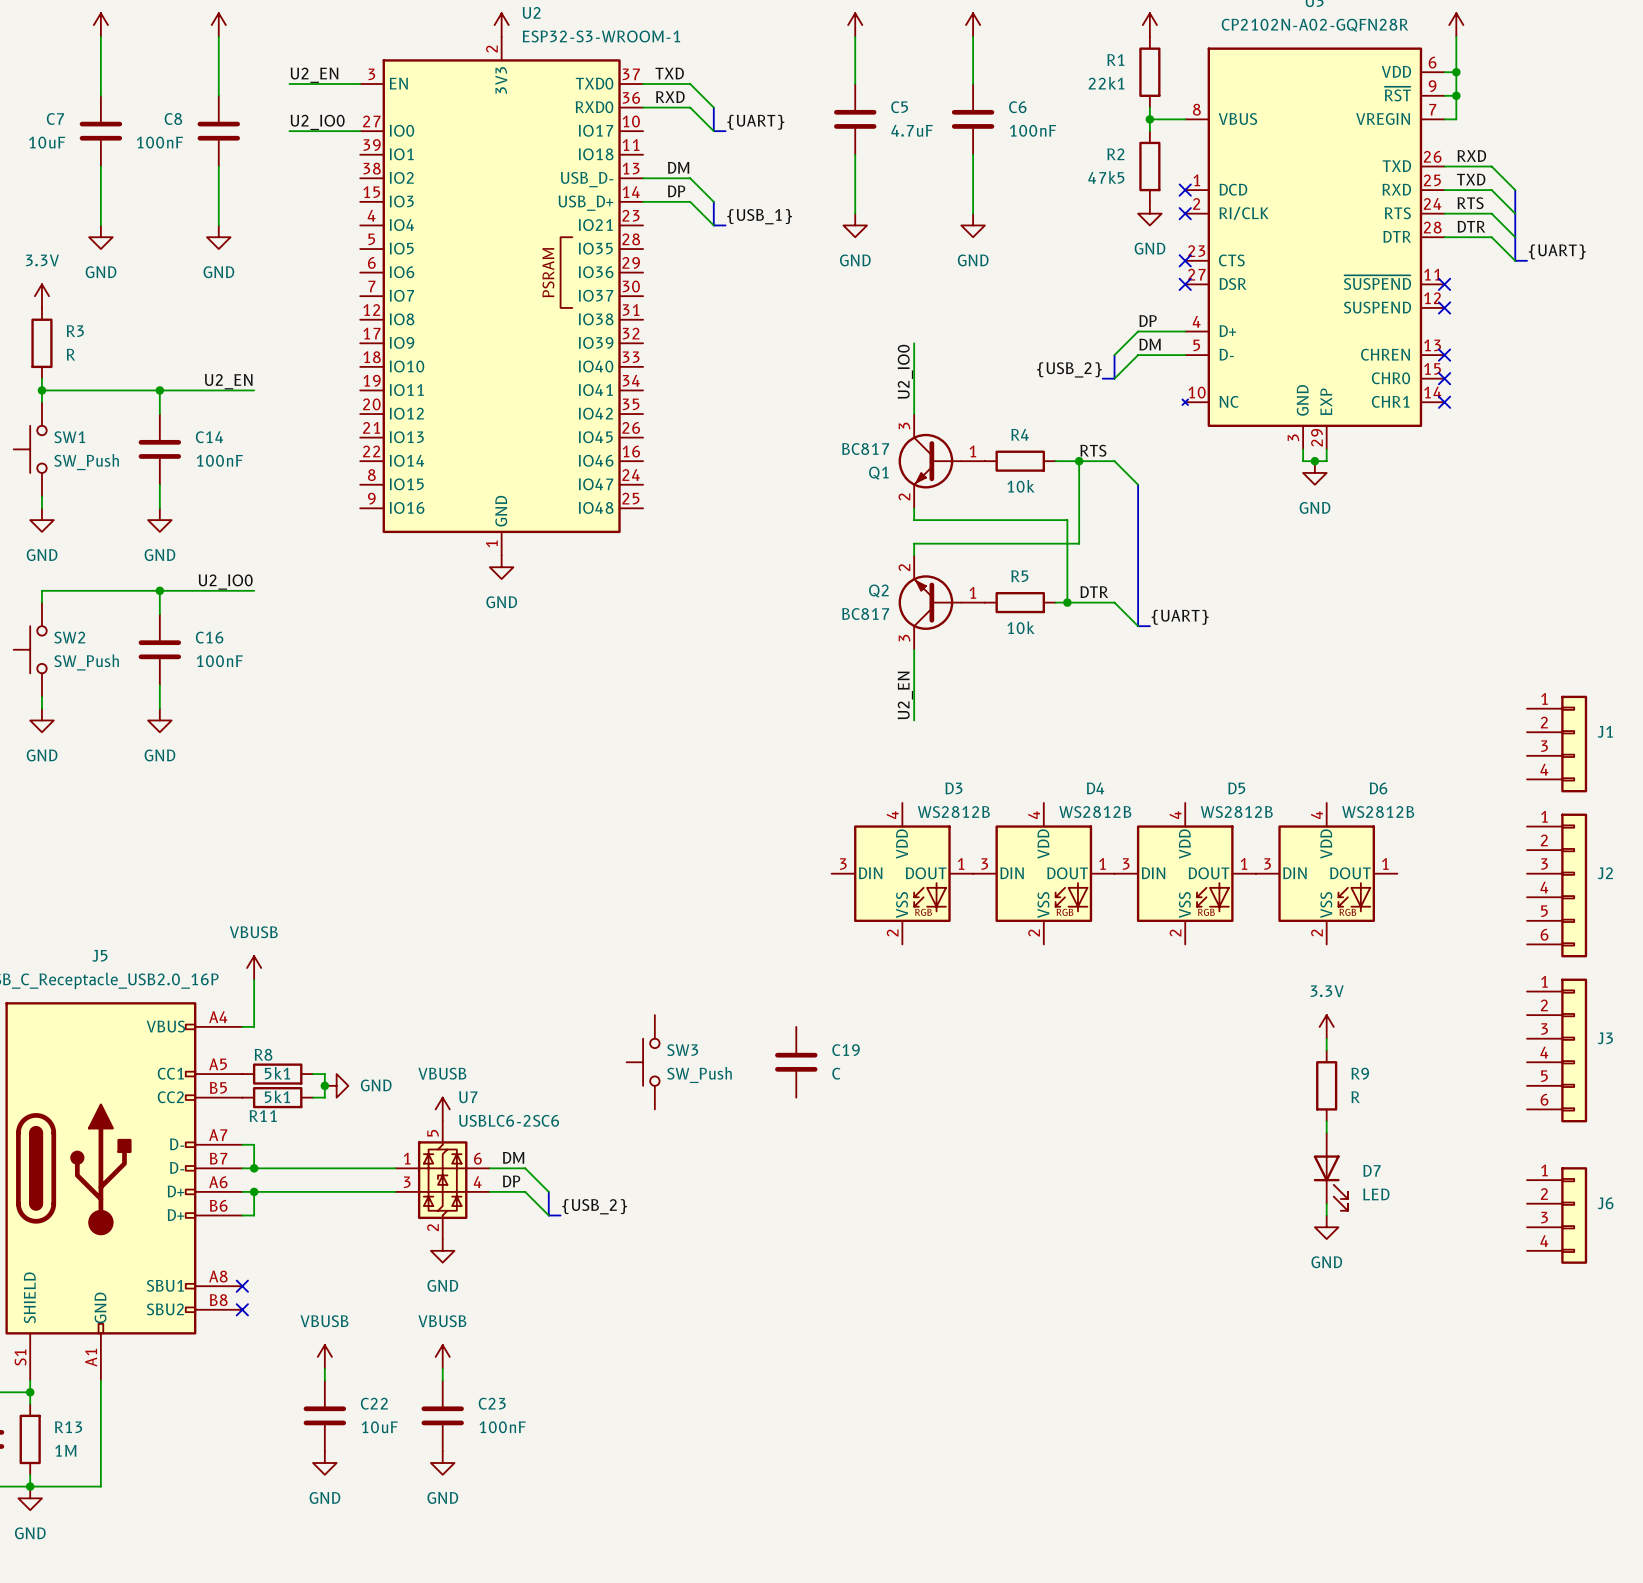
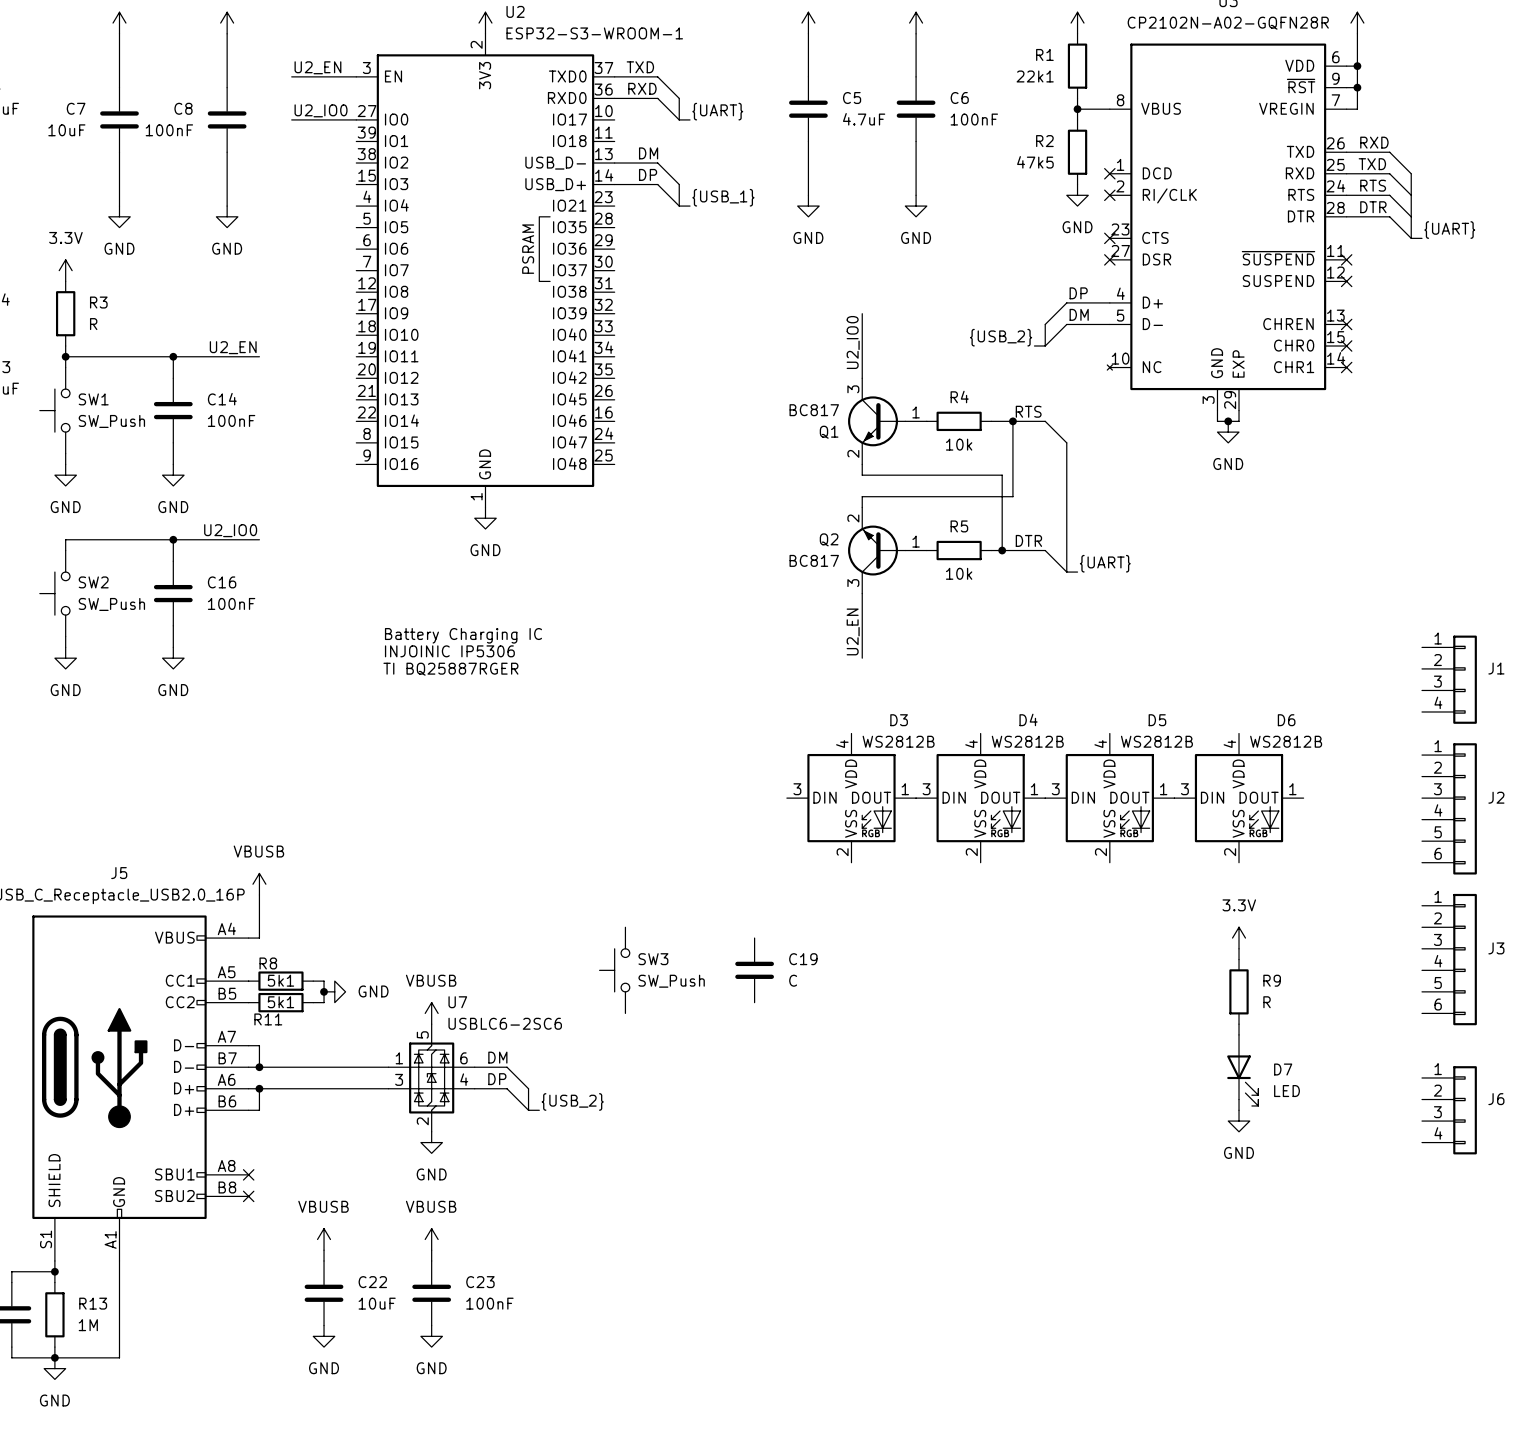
text: none -> Battery Charging IC (463, 635)
text: none -> INJOINIC IP5306 (449, 651)
text: none -> TI BQ25887RGER (450, 669)

